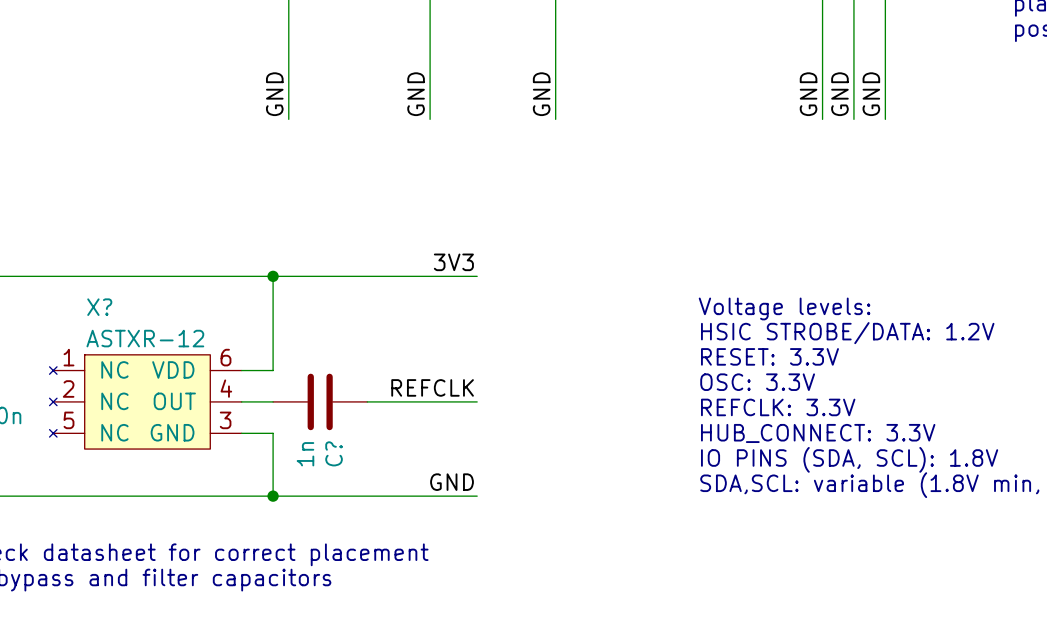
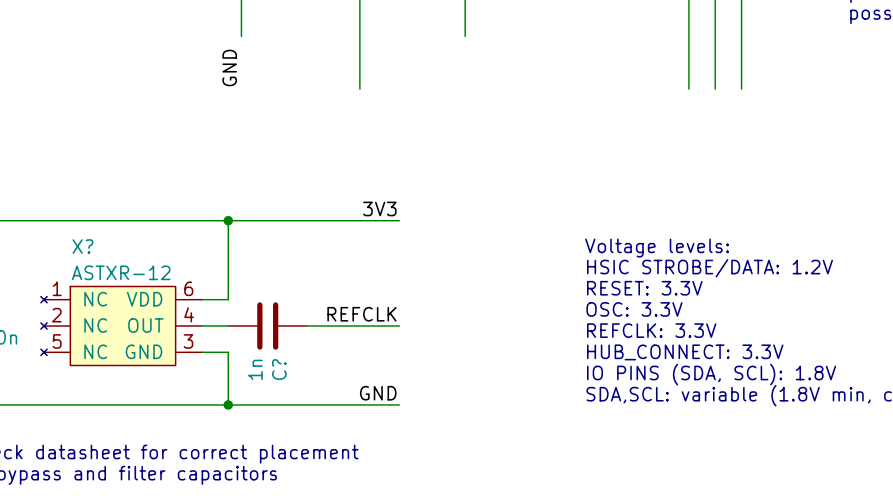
wire: (288, 56) (288, 119) -> none
wire: (555, 56) (555, 119) -> none
label: GND (416, 94) -> none
label: GND (541, 94) -> none
label: GND (808, 94) -> none
label: GND (839, 94) -> none
label: GND (871, 94) -> none

